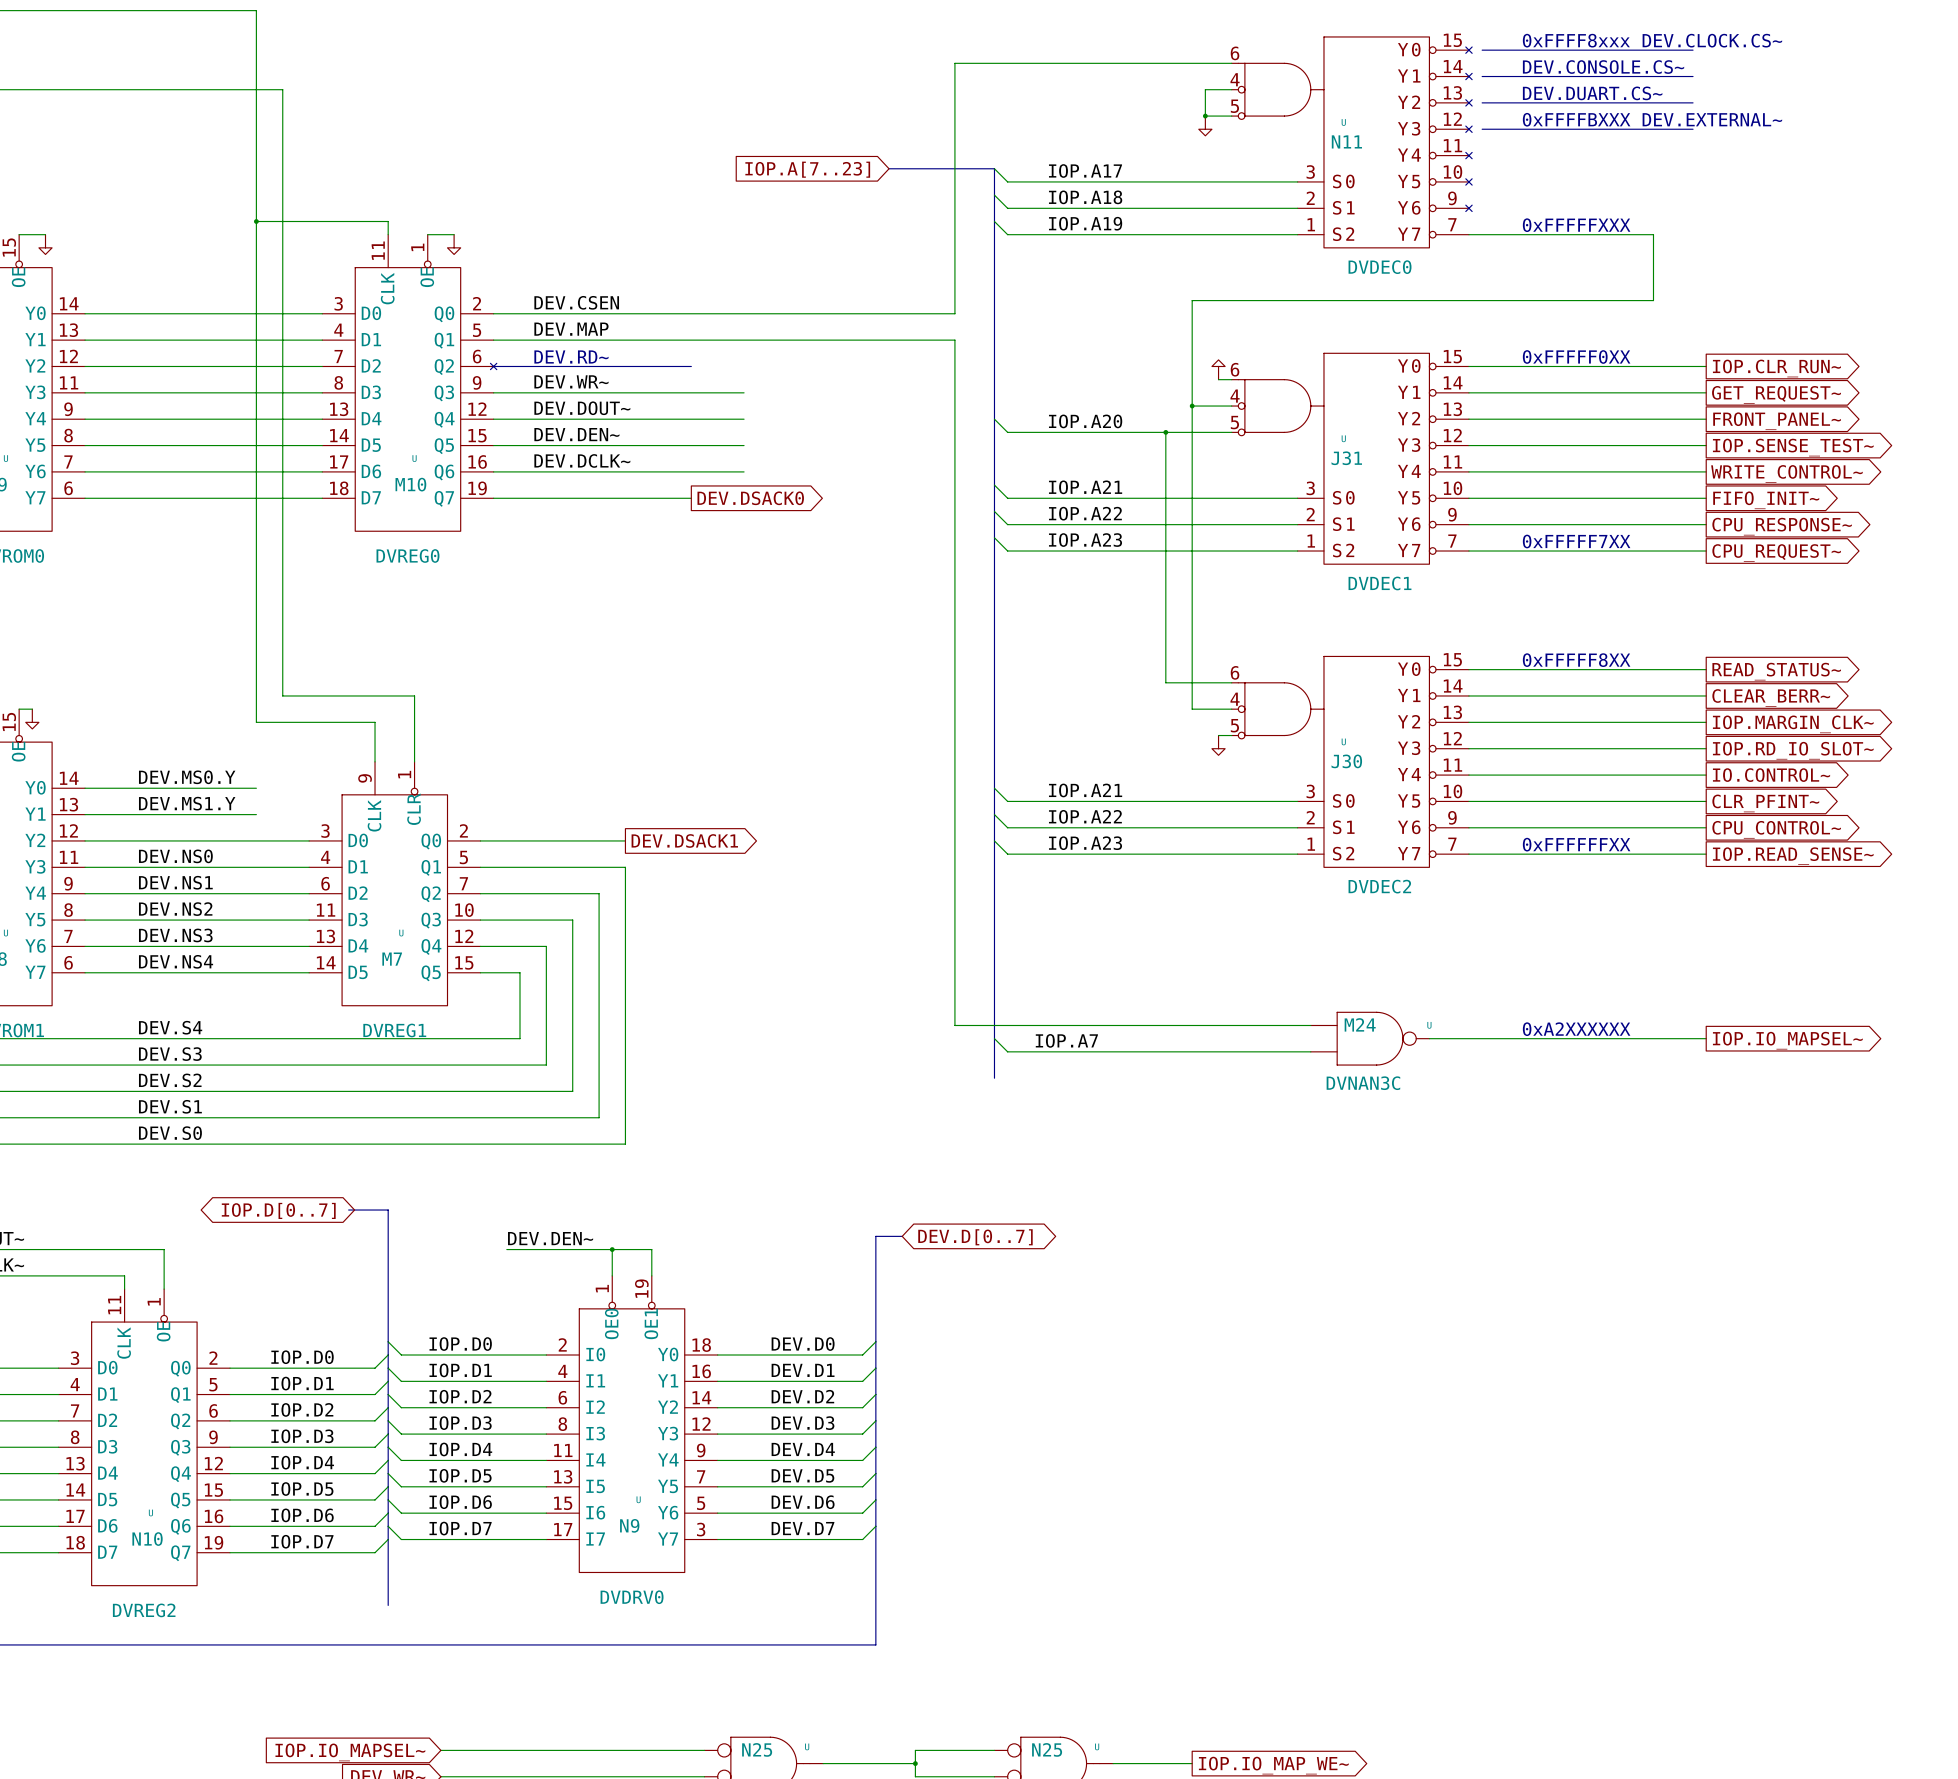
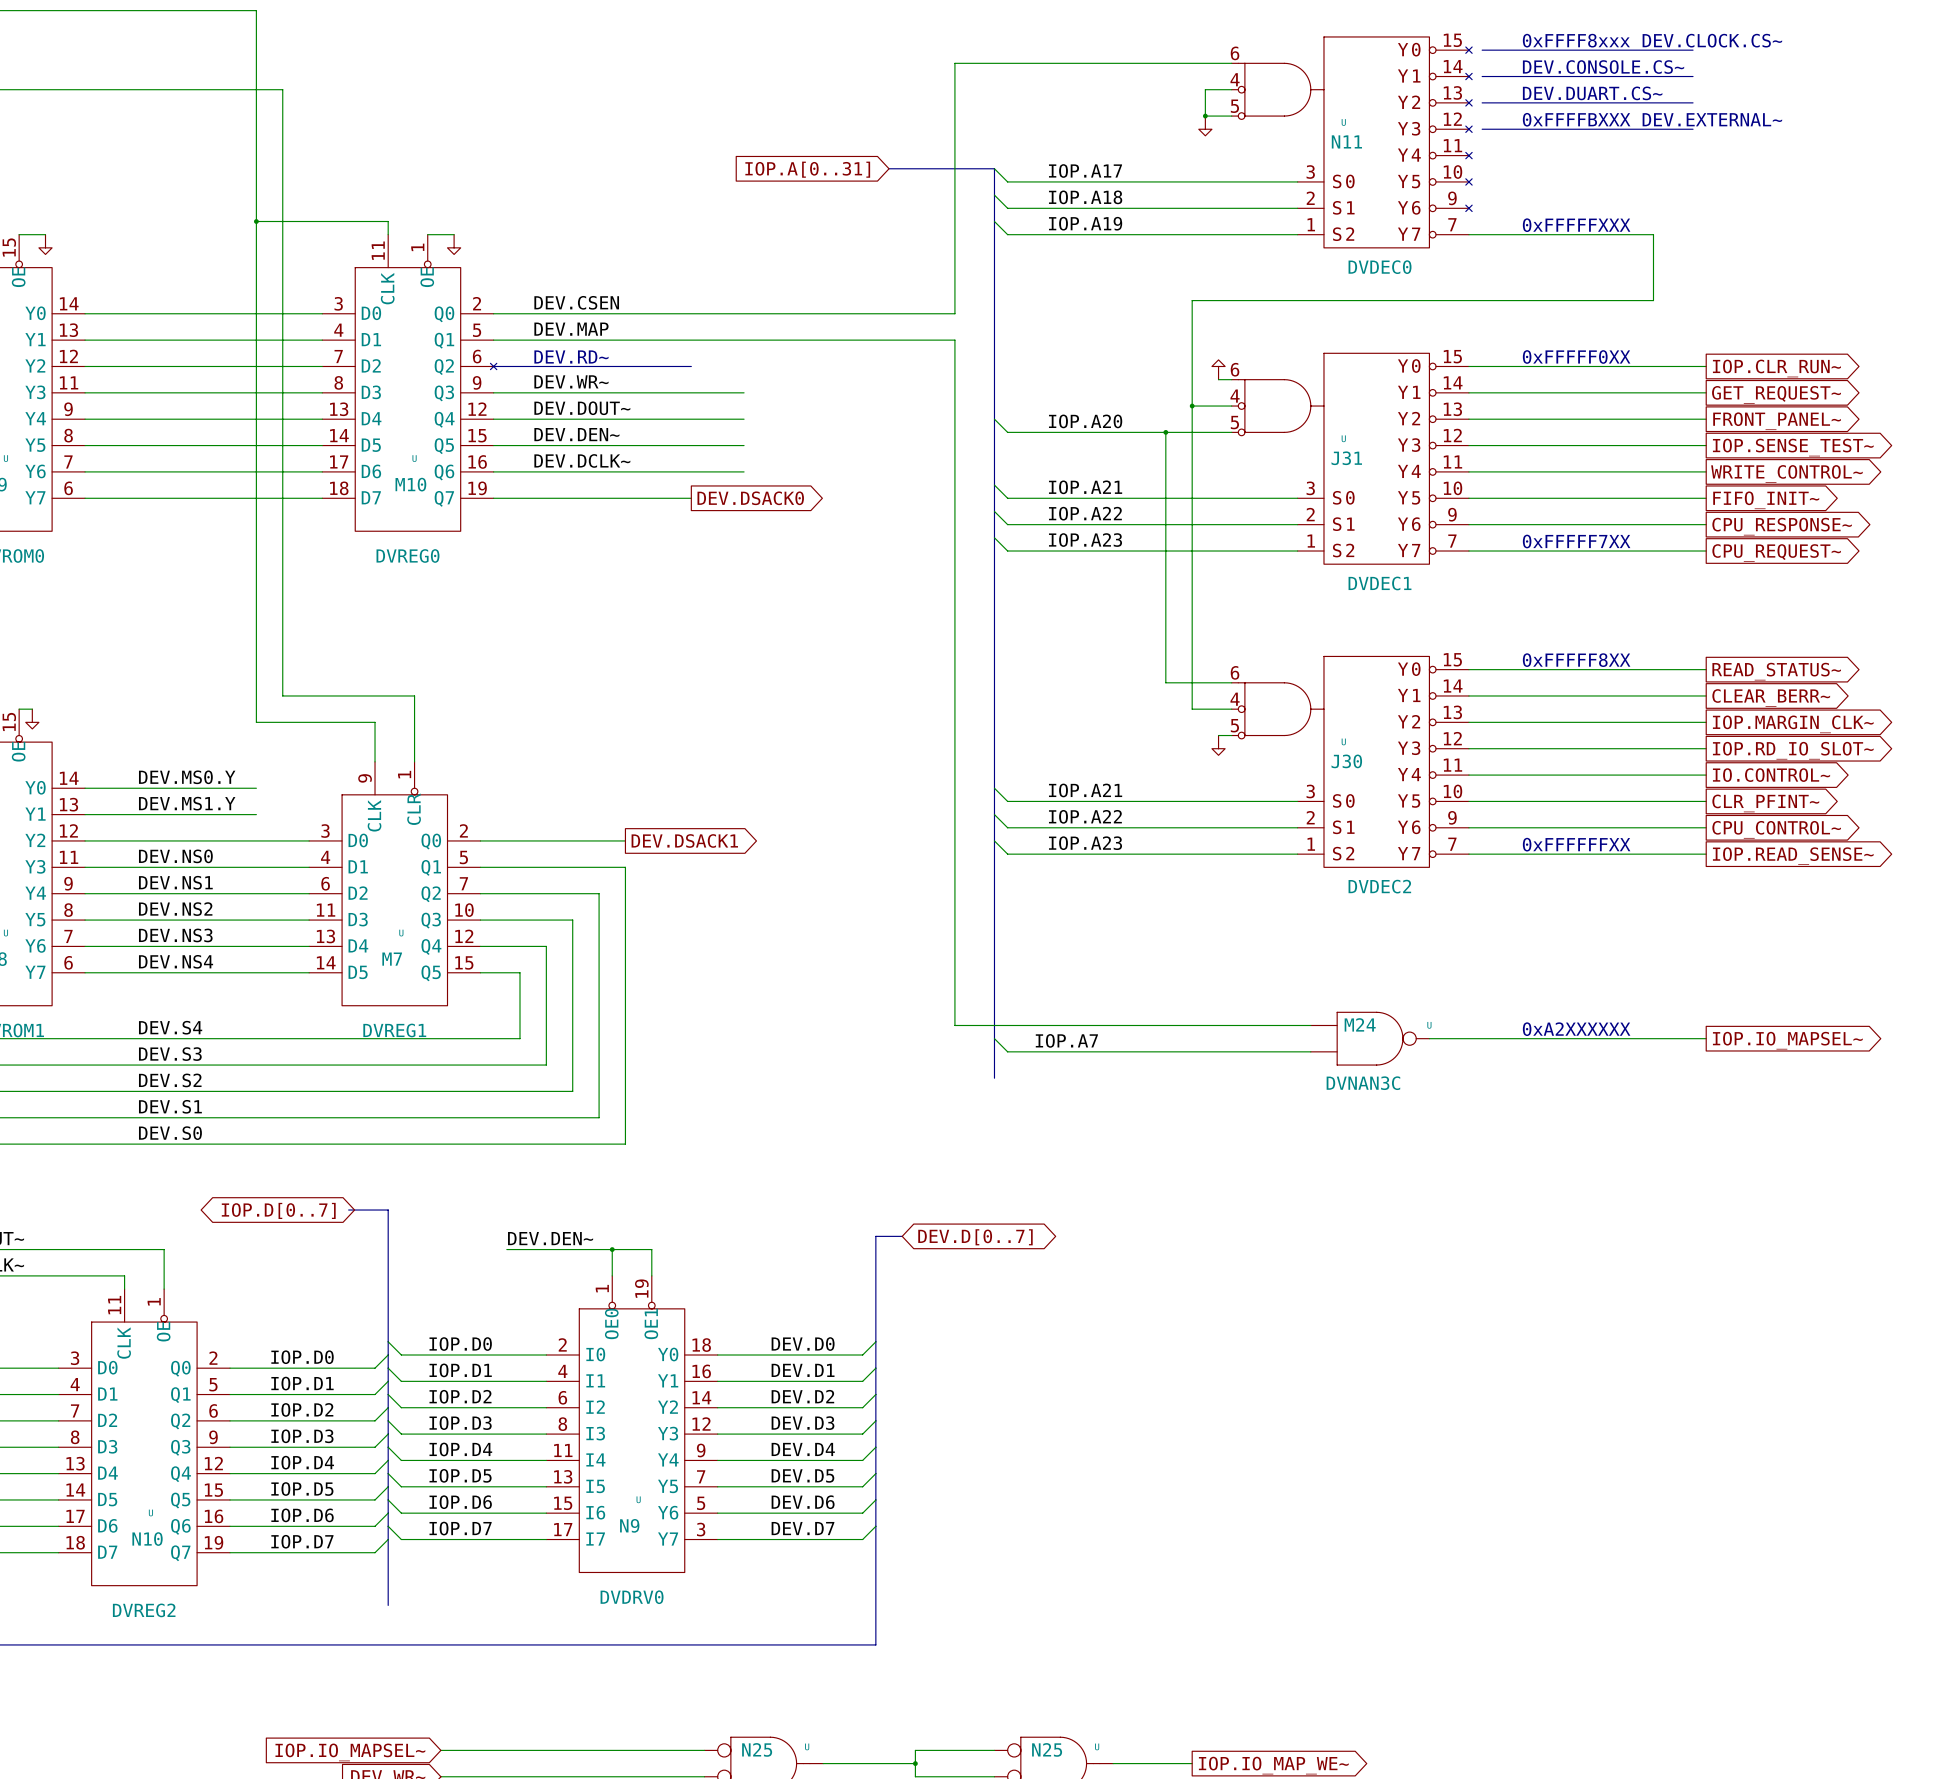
global label: IOP.A[7..23] (807, 169) -> IOP.A[0..31] (807, 169)

